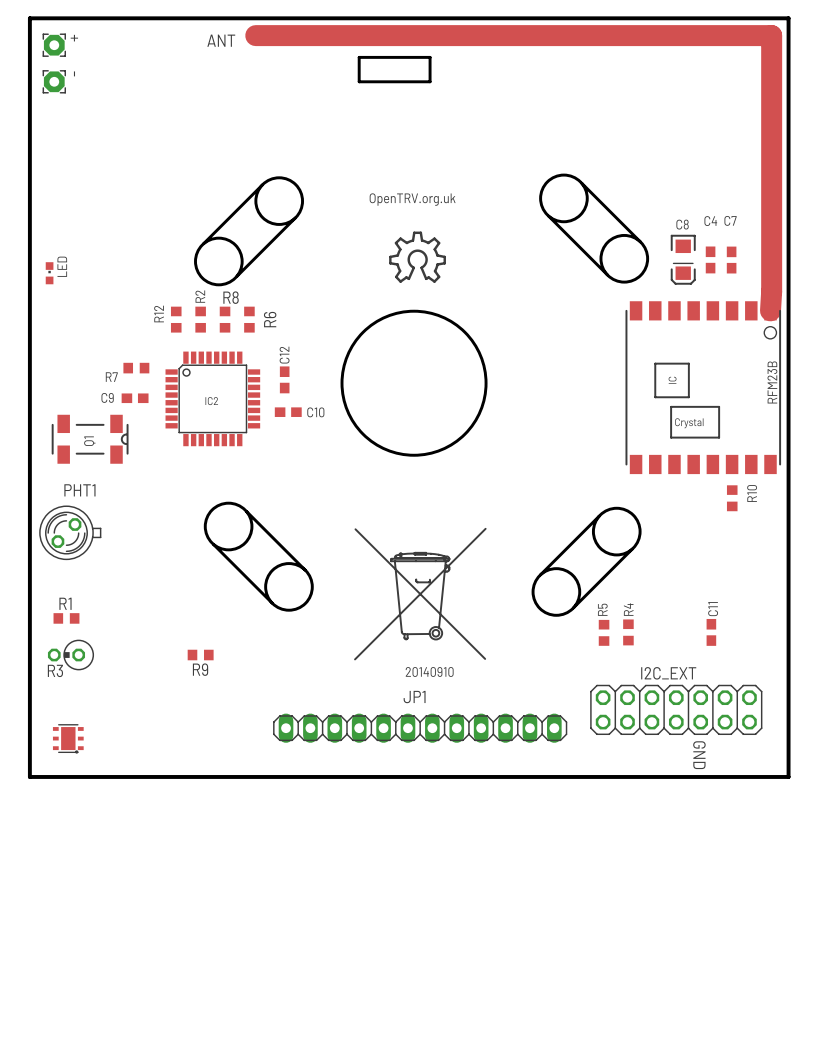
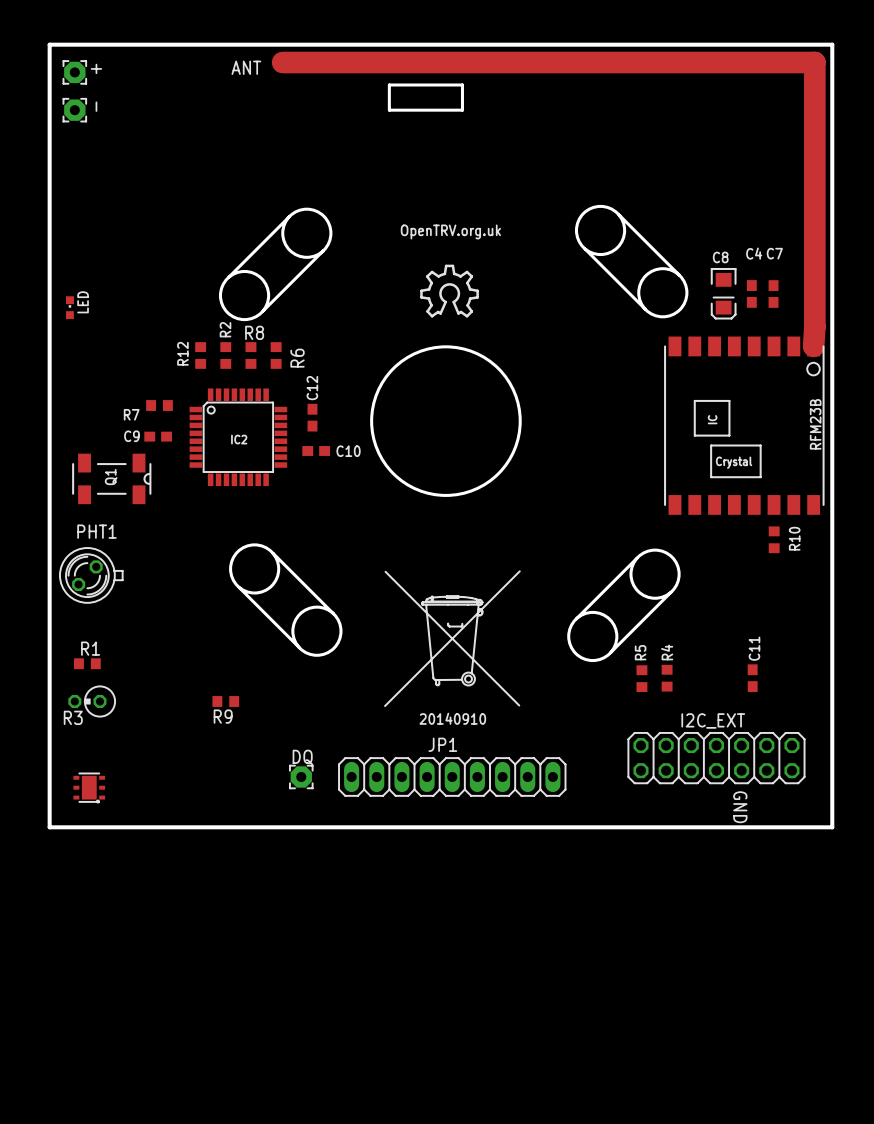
JP1 footprint: [273, 713, 568, 743] -> [338, 757, 567, 797]
DQ: none -> (301, 776)

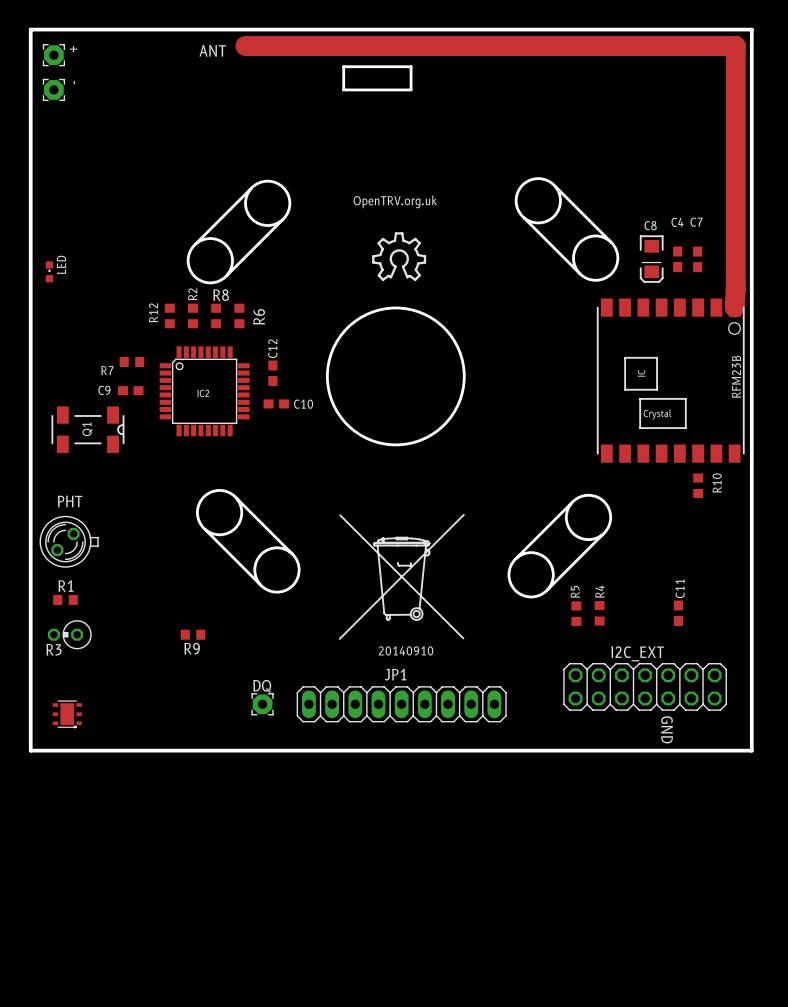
PHT1: (91, 575) -> none
PHT: none -> (69, 541)

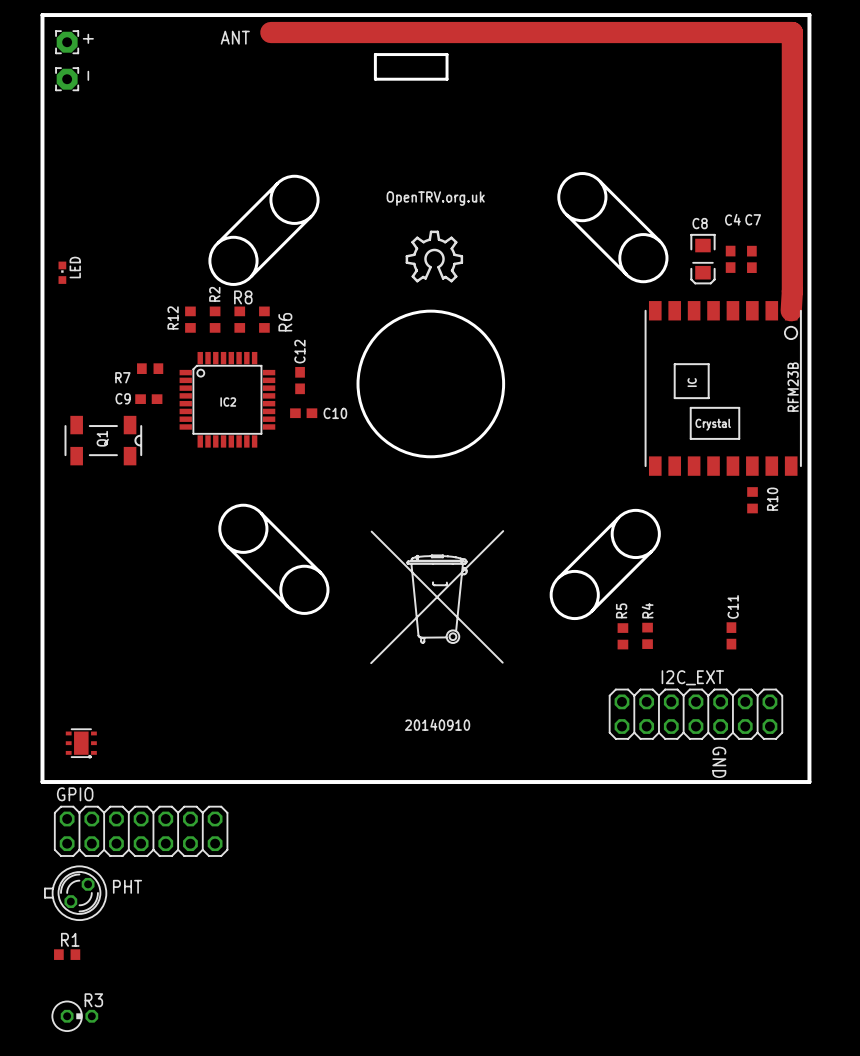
PHT: (69, 541) -> none
R1 position: (65, 599) -> (67, 954)
R3 rotation: 0° (69, 634) -> 180° (74, 1016)
R3 position: (69, 634) -> (74, 1016)
R9: (193, 634) -> none
text position: 20140910 (406, 650) -> 20140910 (437, 724)
DQ: (262, 704) -> none
JP1: (401, 704) -> none
GPIO: none -> (141, 831)
PHT: none -> (75, 893)

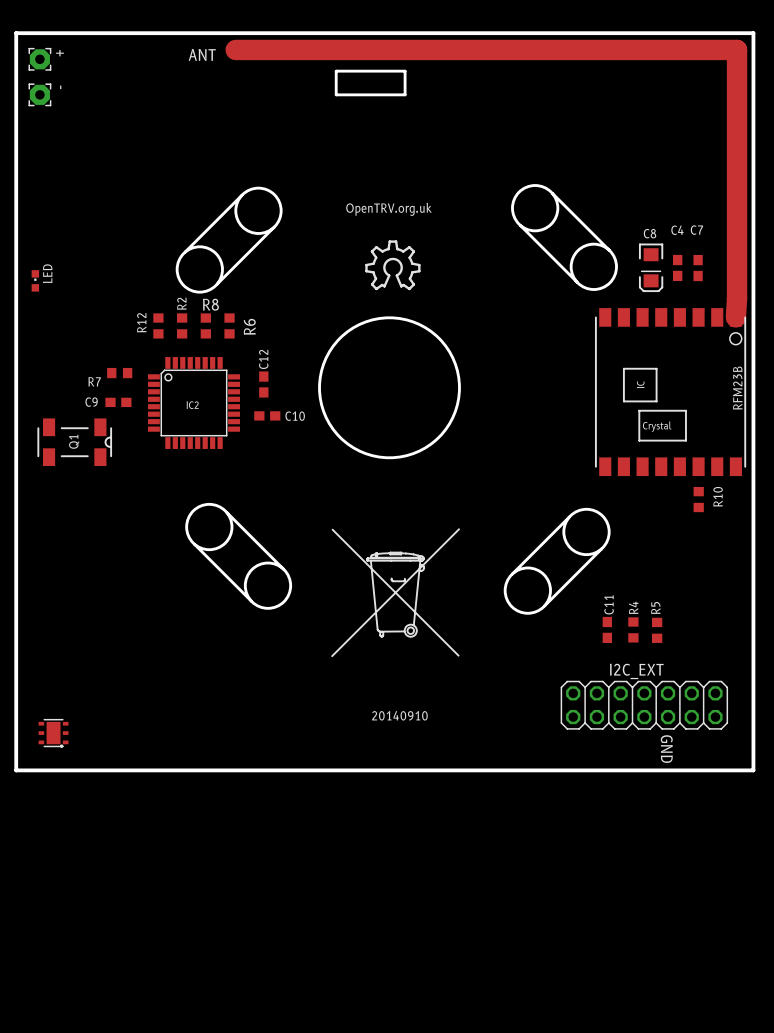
R4 position: (647, 635) -> (633, 629)
C11 position: (731, 635) -> (607, 629)
R5 position: (622, 636) -> (657, 630)
GPIO: (141, 831) -> none
PHT: (75, 893) -> none
R1: (67, 954) -> none
R3: (74, 1016) -> none

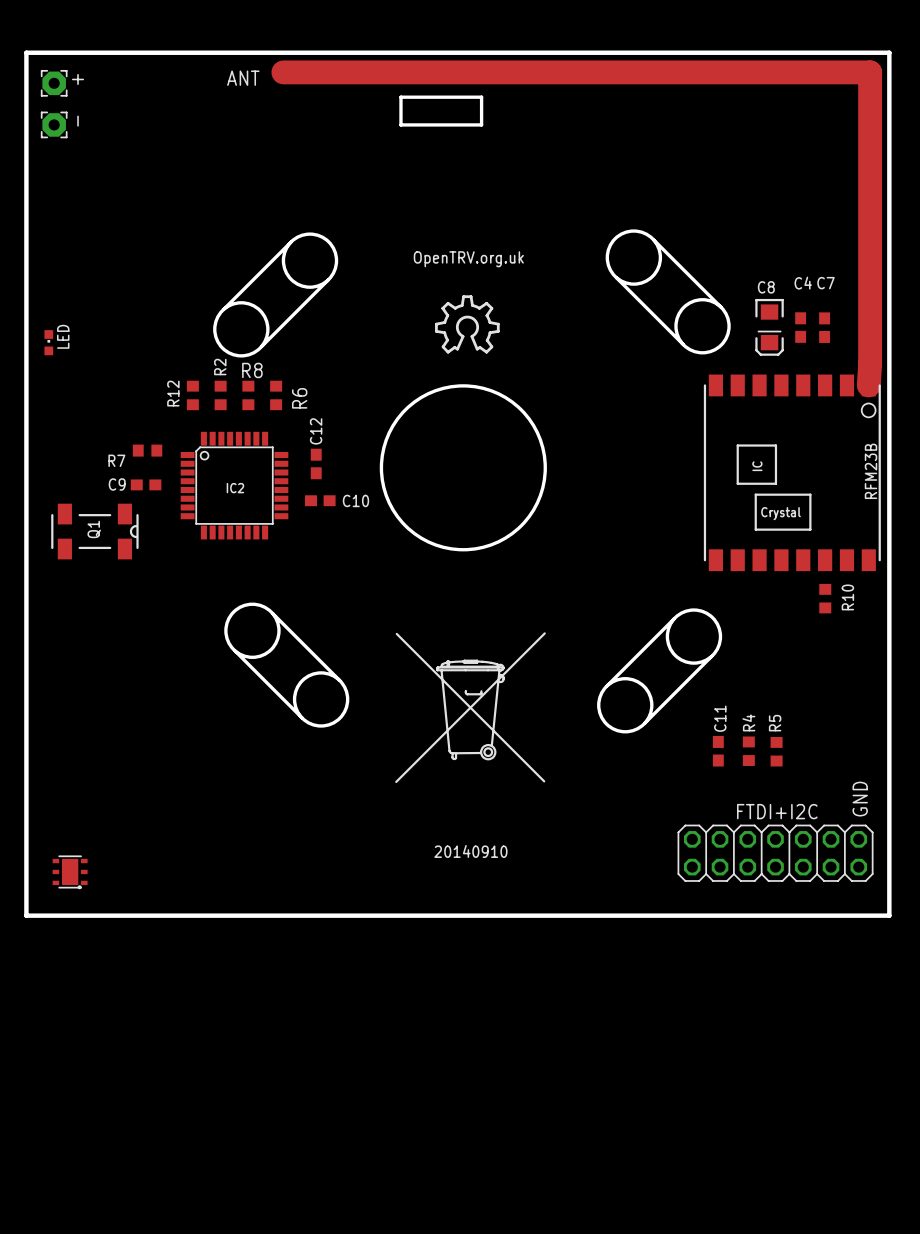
I2C_EXT: (644, 705) -> none
FTDI+I2C: none -> (775, 853)
text rotation: 0° (666, 749) -> 180° (860, 799)
text position: GND (666, 749) -> GND (860, 799)

